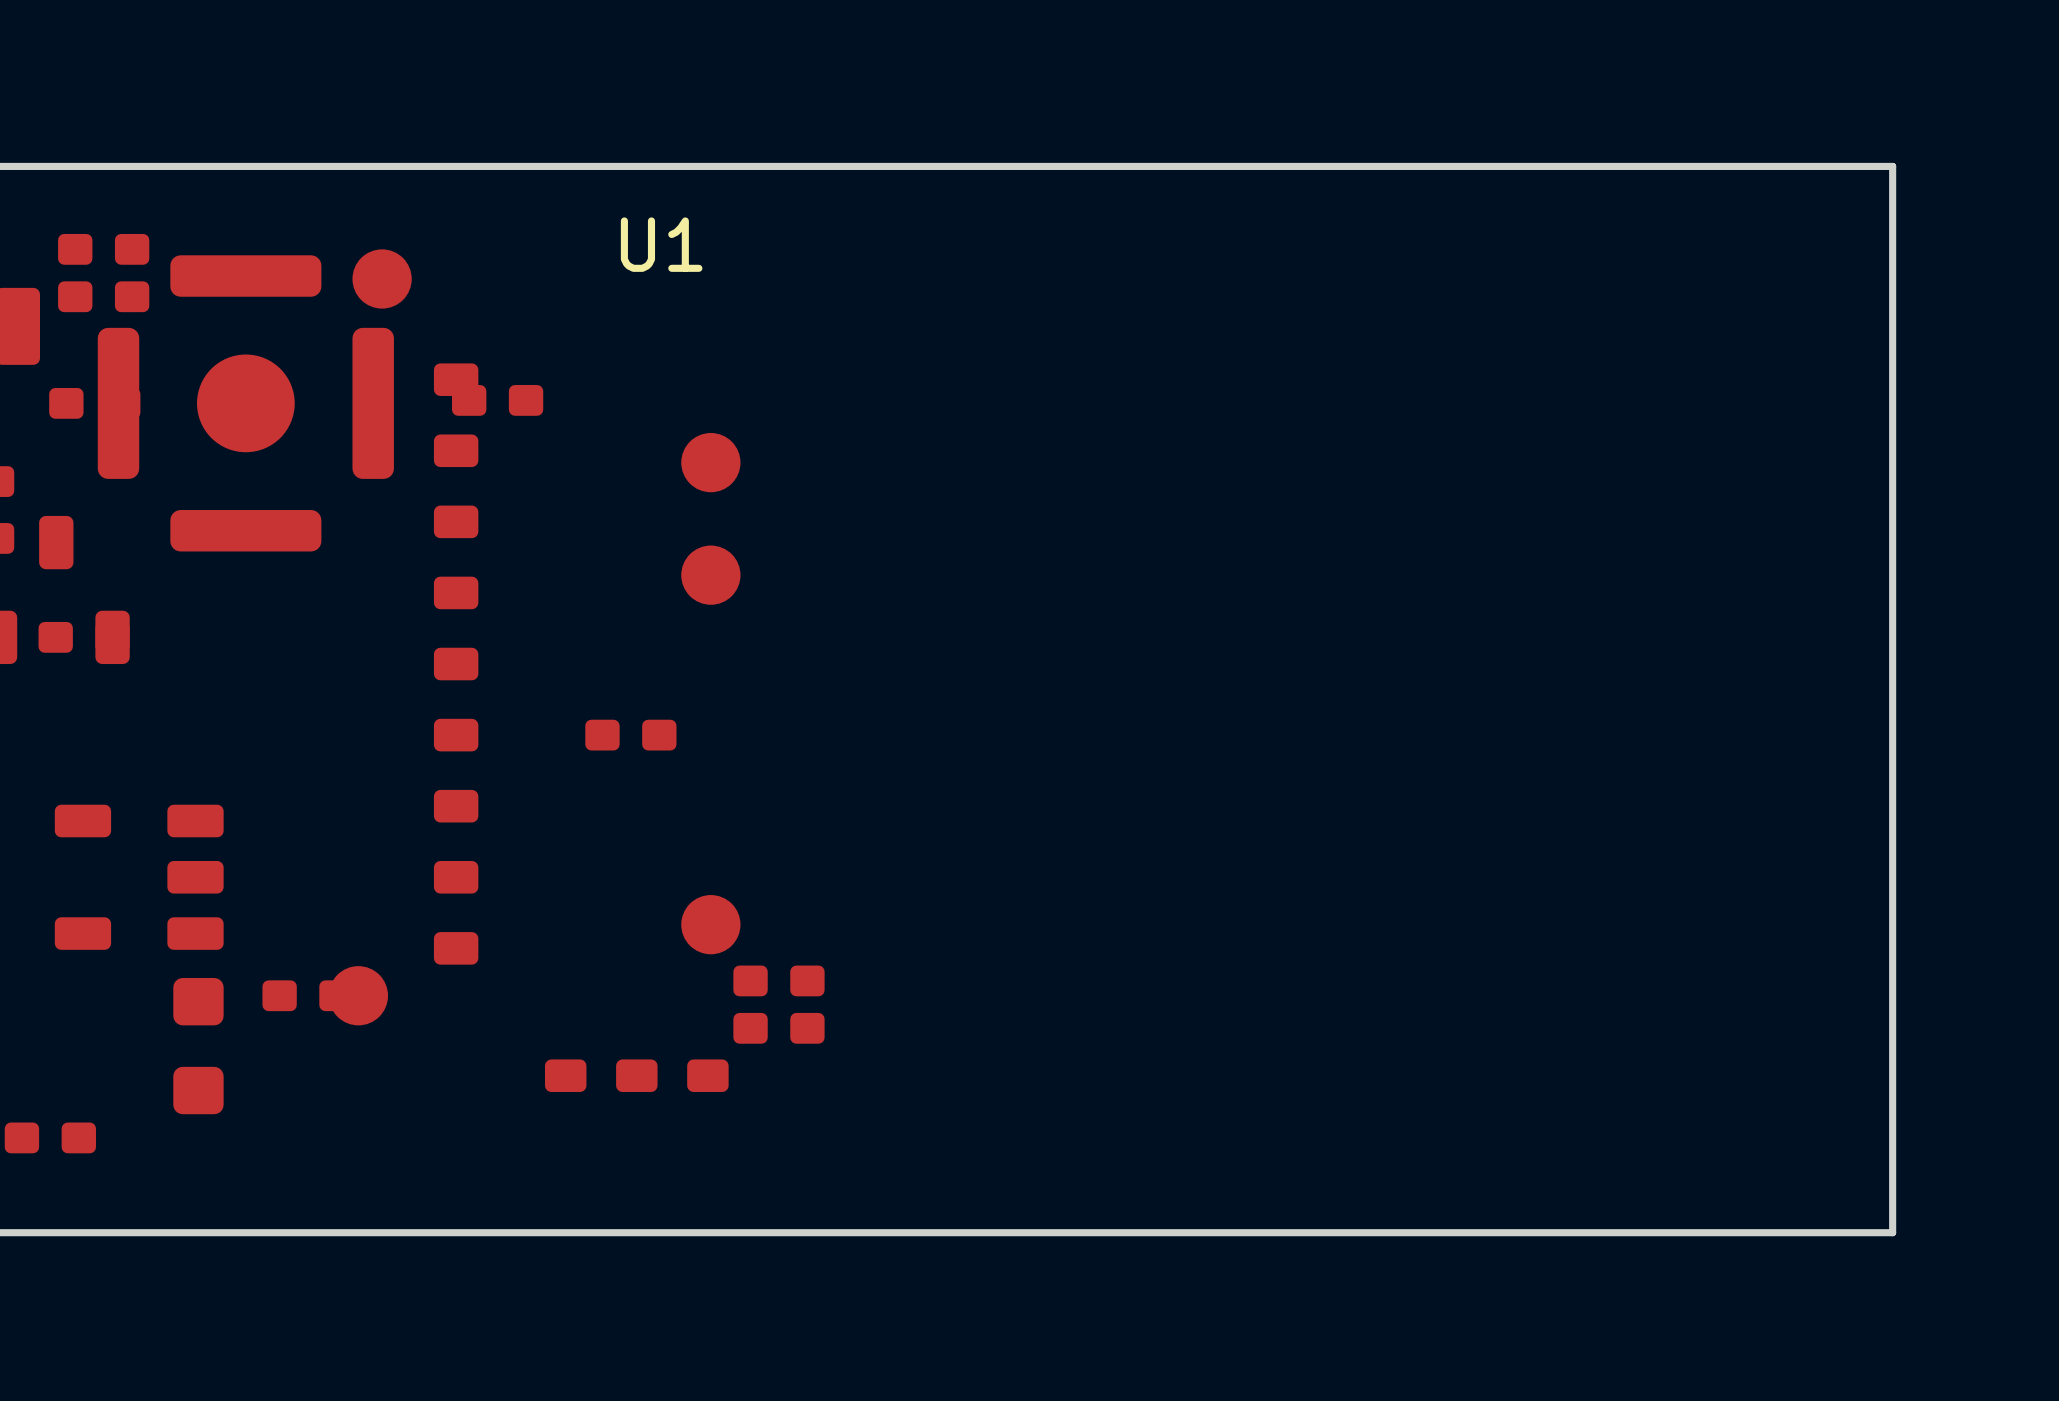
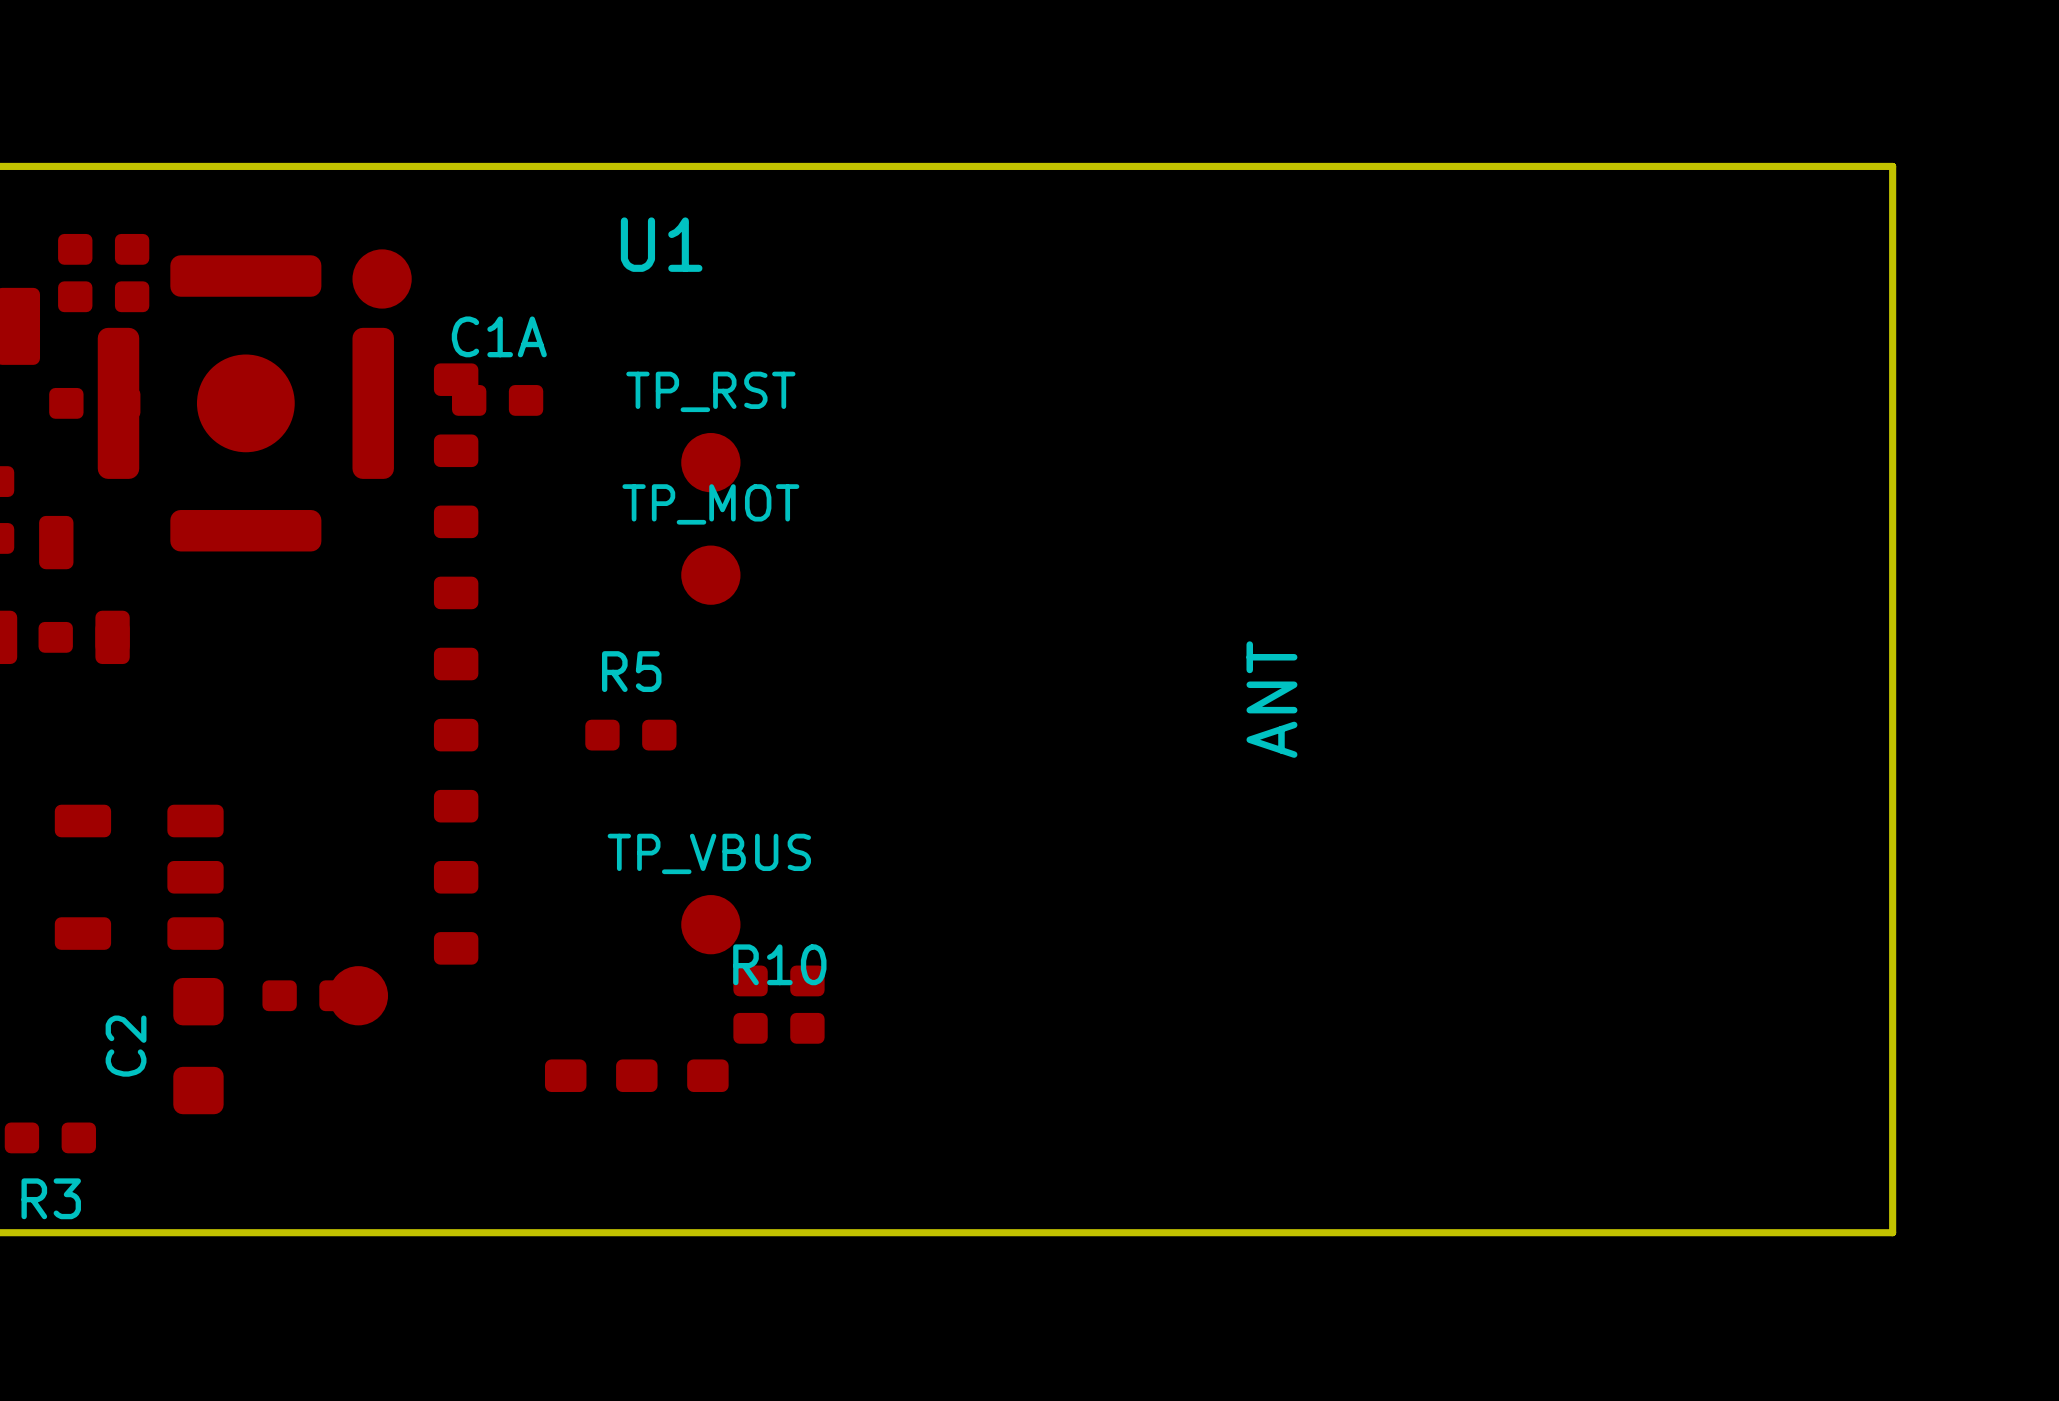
C1A name: none -> C1A (499, 336)
TP_RST name: none -> TP_RST (710, 391)
TP_MOT name: none -> TP_MOT (710, 504)
R5 name: none -> R5 (631, 671)
U1 text: none -> ANT (1271, 699)
TP_VBUS name: none -> TP_VBUS (709, 853)
R10 name: none -> R10 (779, 964)
C2 name: none -> C2 (126, 1046)
R3 name: none -> R3 (51, 1198)

